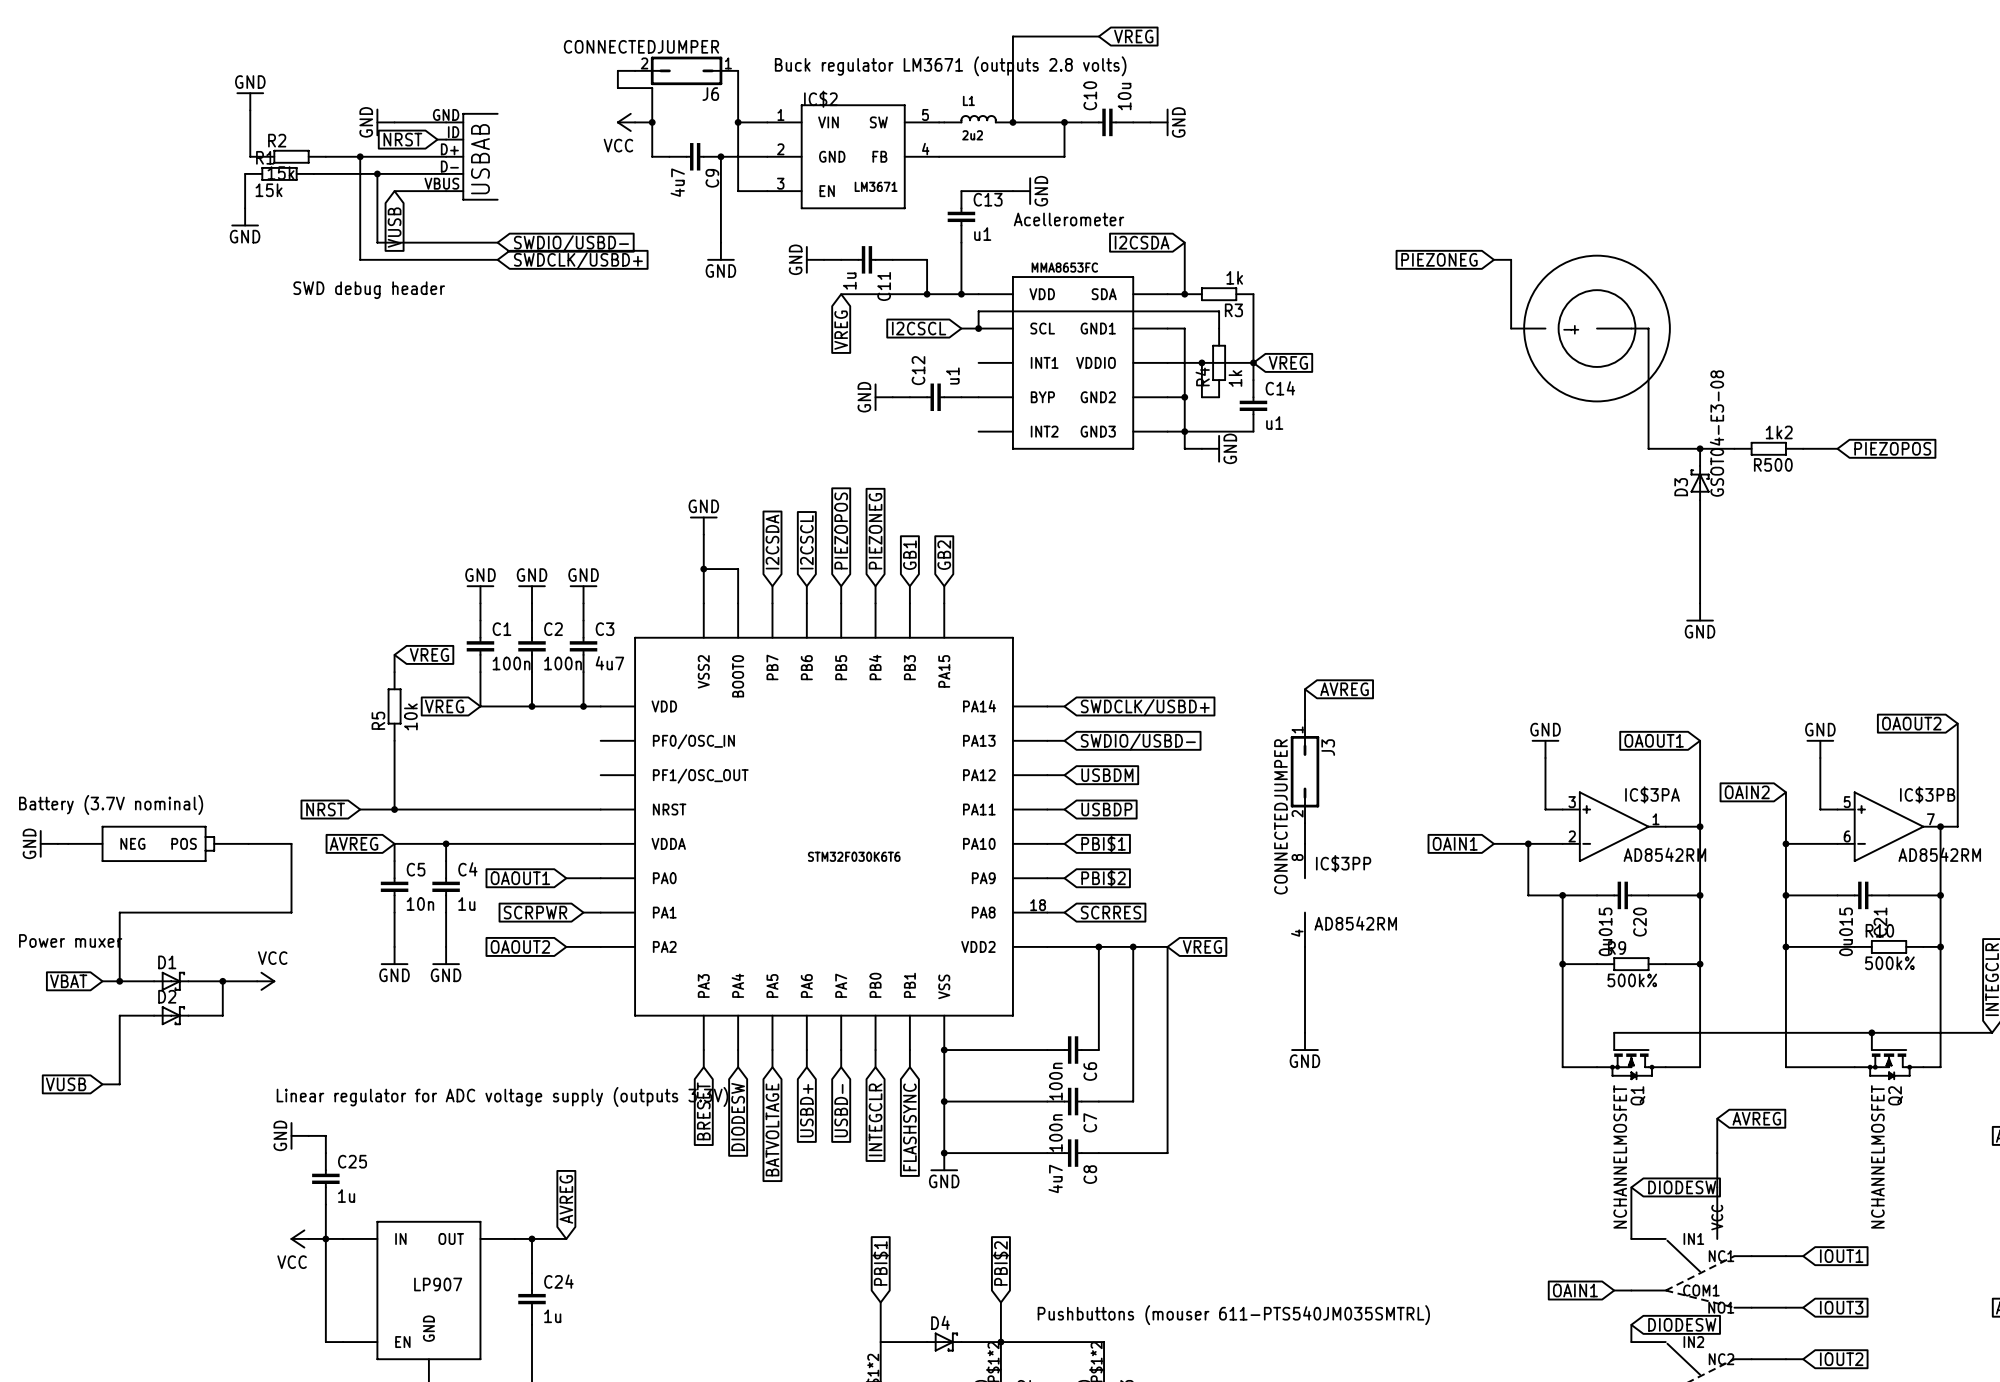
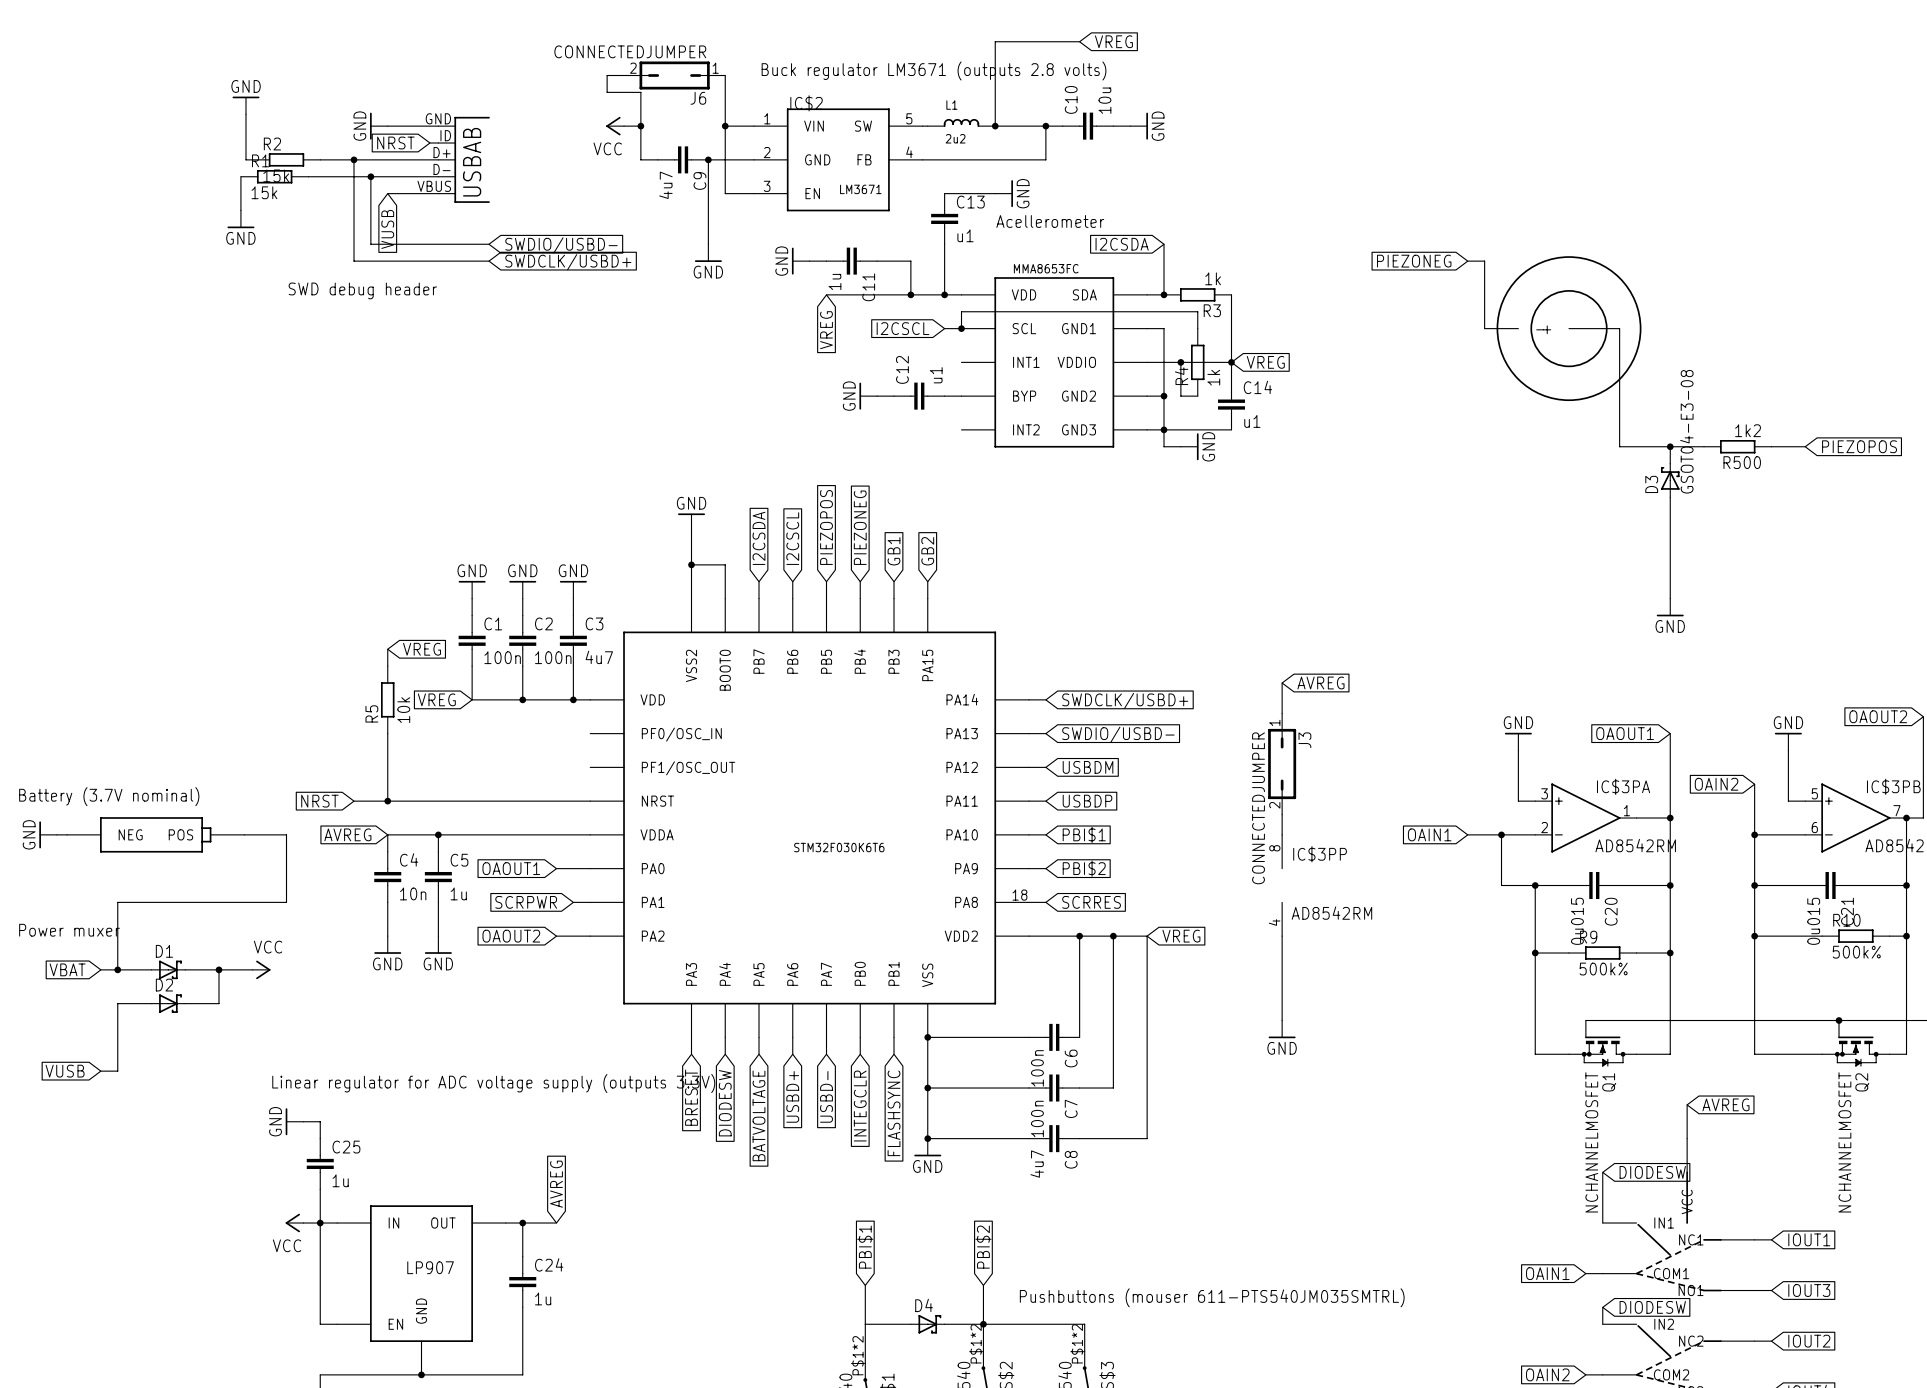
C5 name: C5 (416, 869) -> C4 (409, 859)
C4 name: C4 (467, 869) -> C5 (459, 860)

